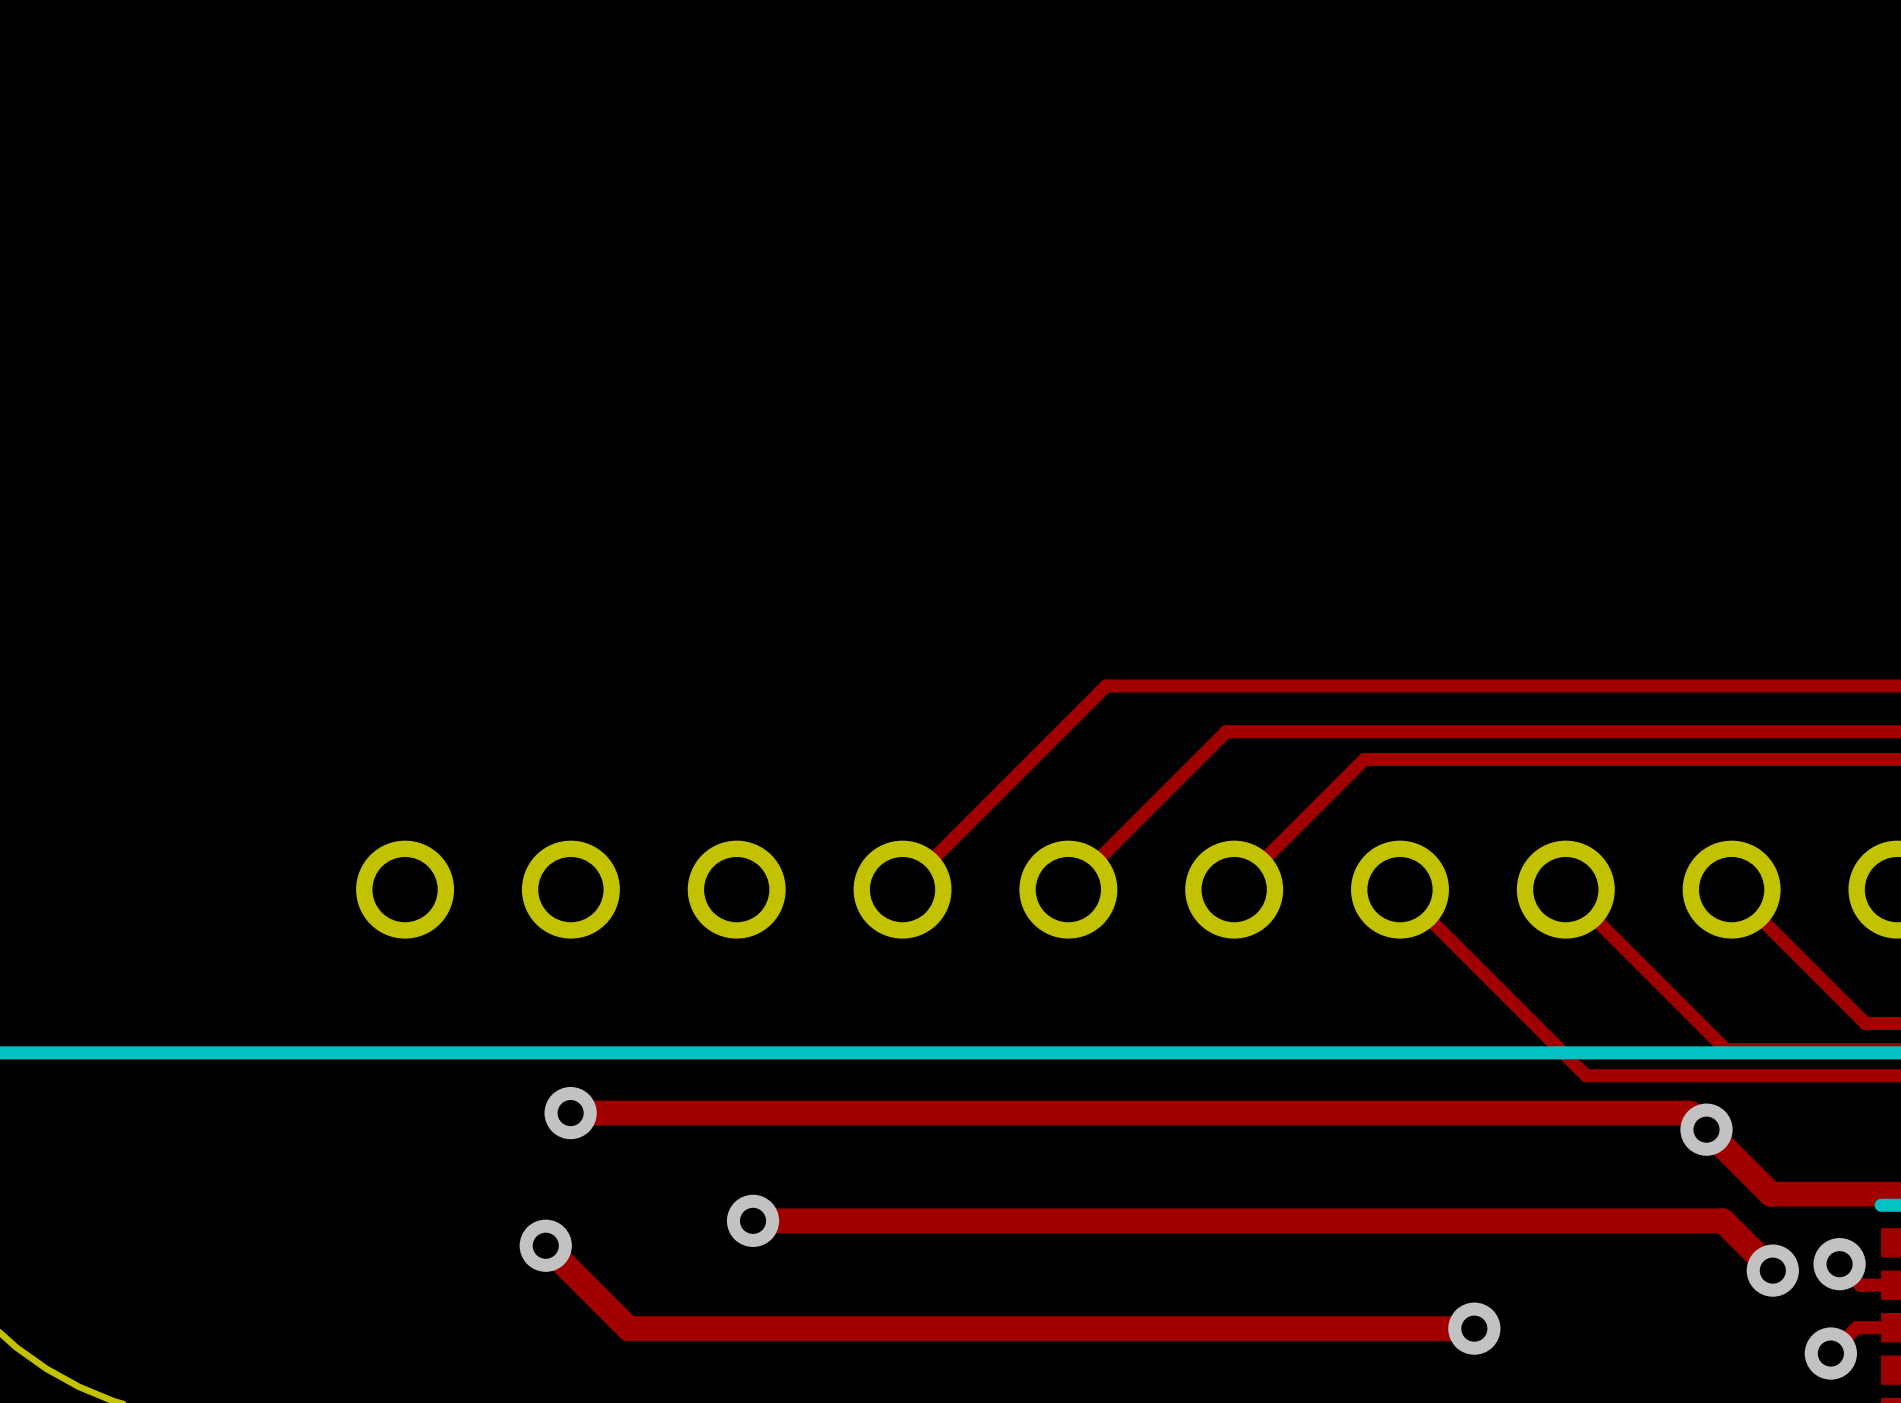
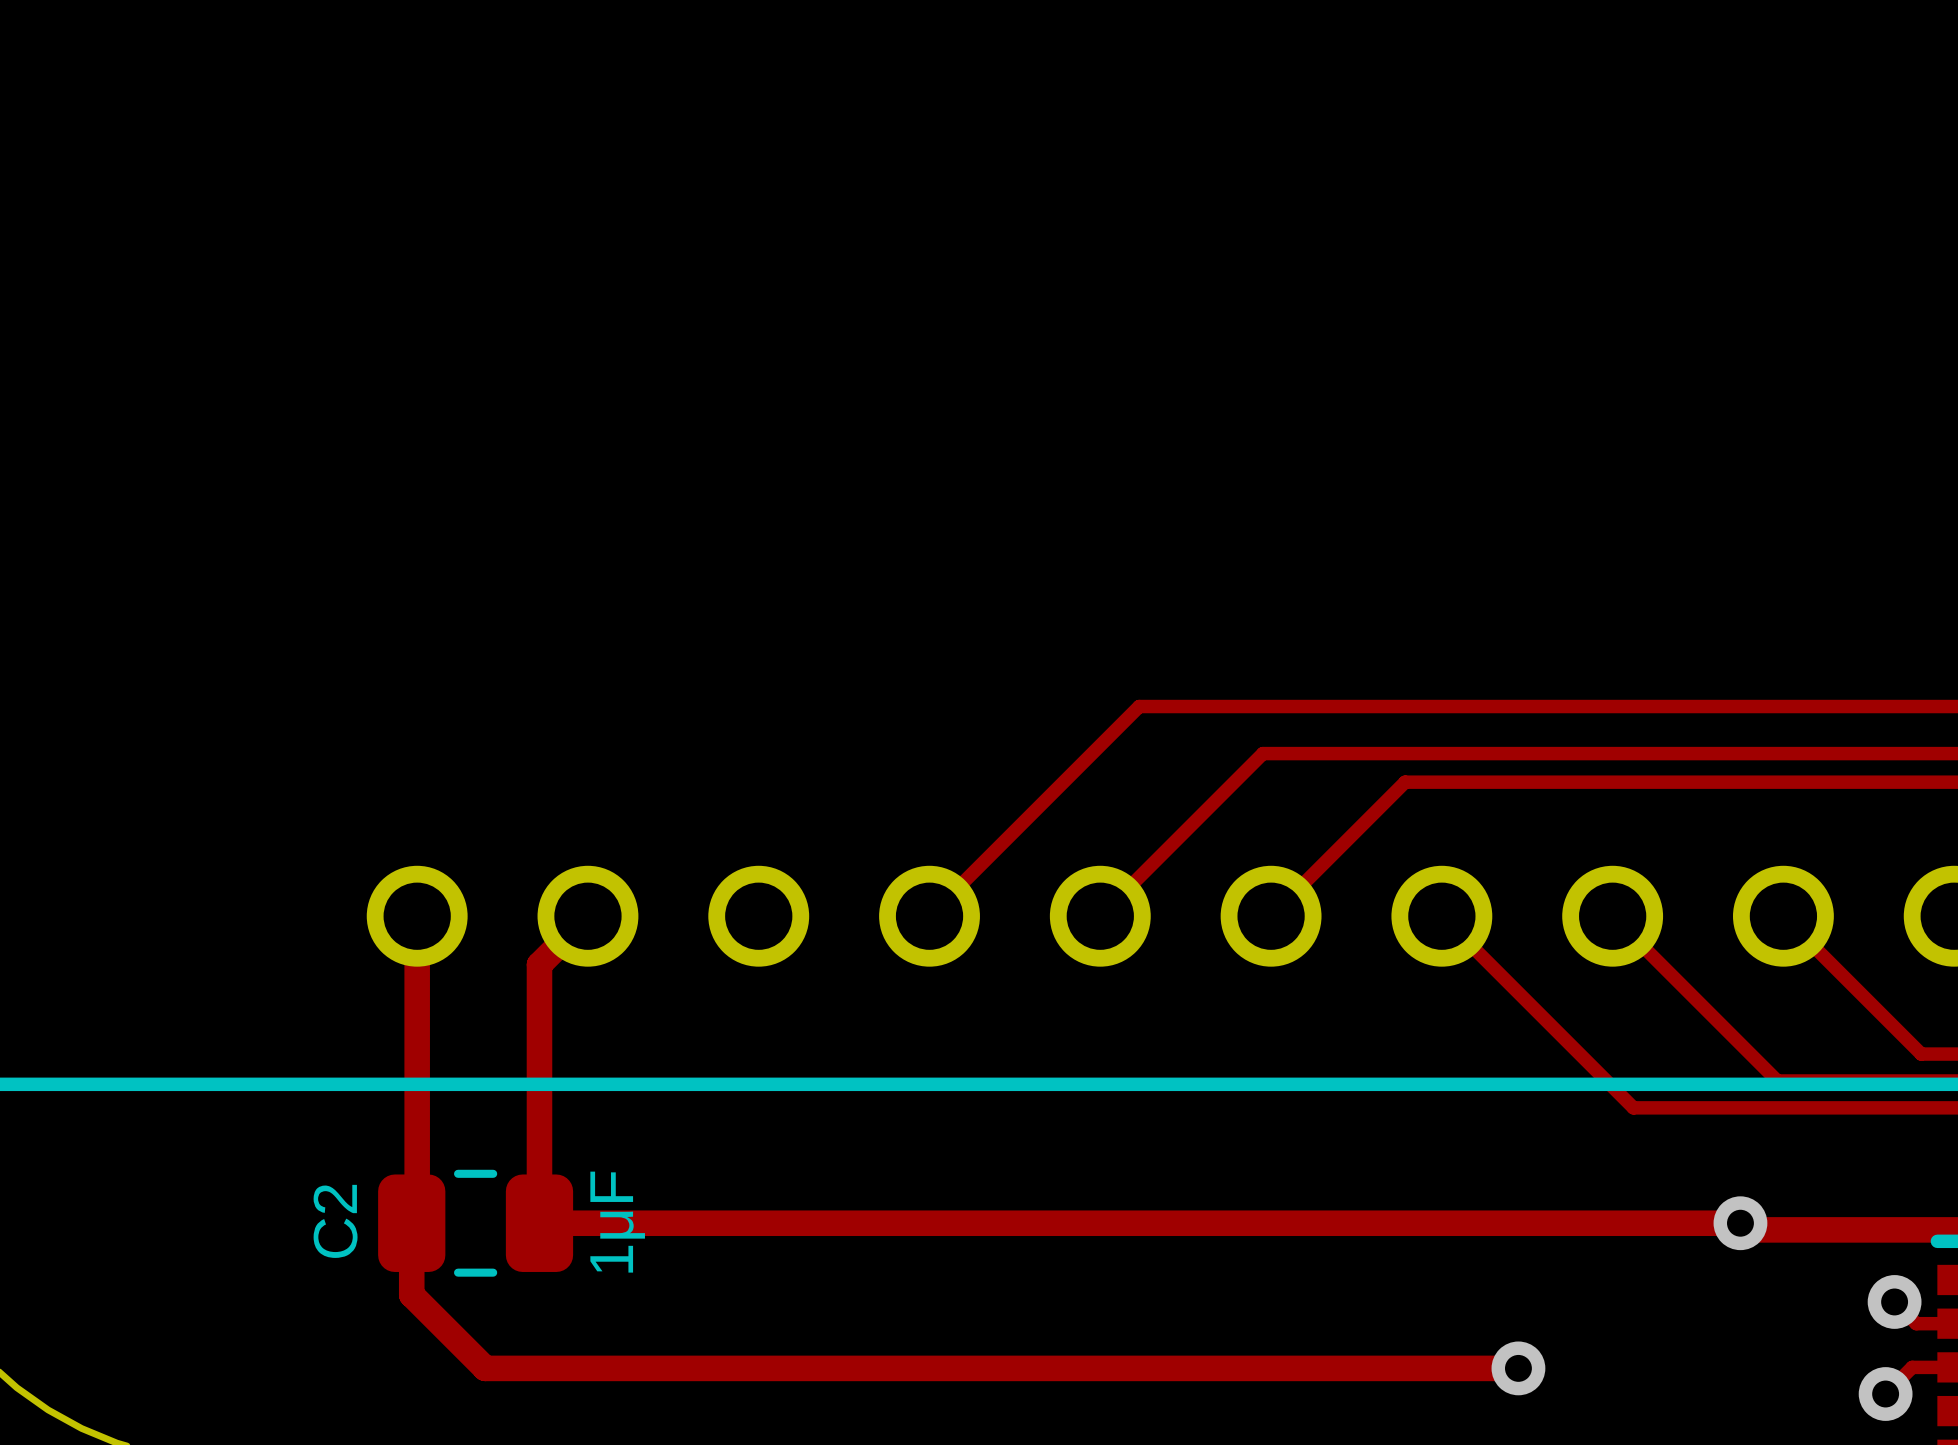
track: none -> (417, 916) (417, 1217)
track: (570, 1113) (1689, 1113) (1770, 1194) -> (587, 916) (539, 964) (539, 1223) (1740, 1223) (1747, 1229) (1823, 1229)
via: (570, 1113) -> none
via: (1706, 1129) -> none
C2: none -> 1μF (475, 1223)
via: none -> (1740, 1223)
track: (753, 1220) (1723, 1220) (1772, 1270) -> none
via: (753, 1220) -> none
track: (545, 1245) (628, 1328) -> (411, 1223) (411, 1294) (485, 1368) (647, 1368)
via: (545, 1245) -> none
via: (1772, 1270) -> none

